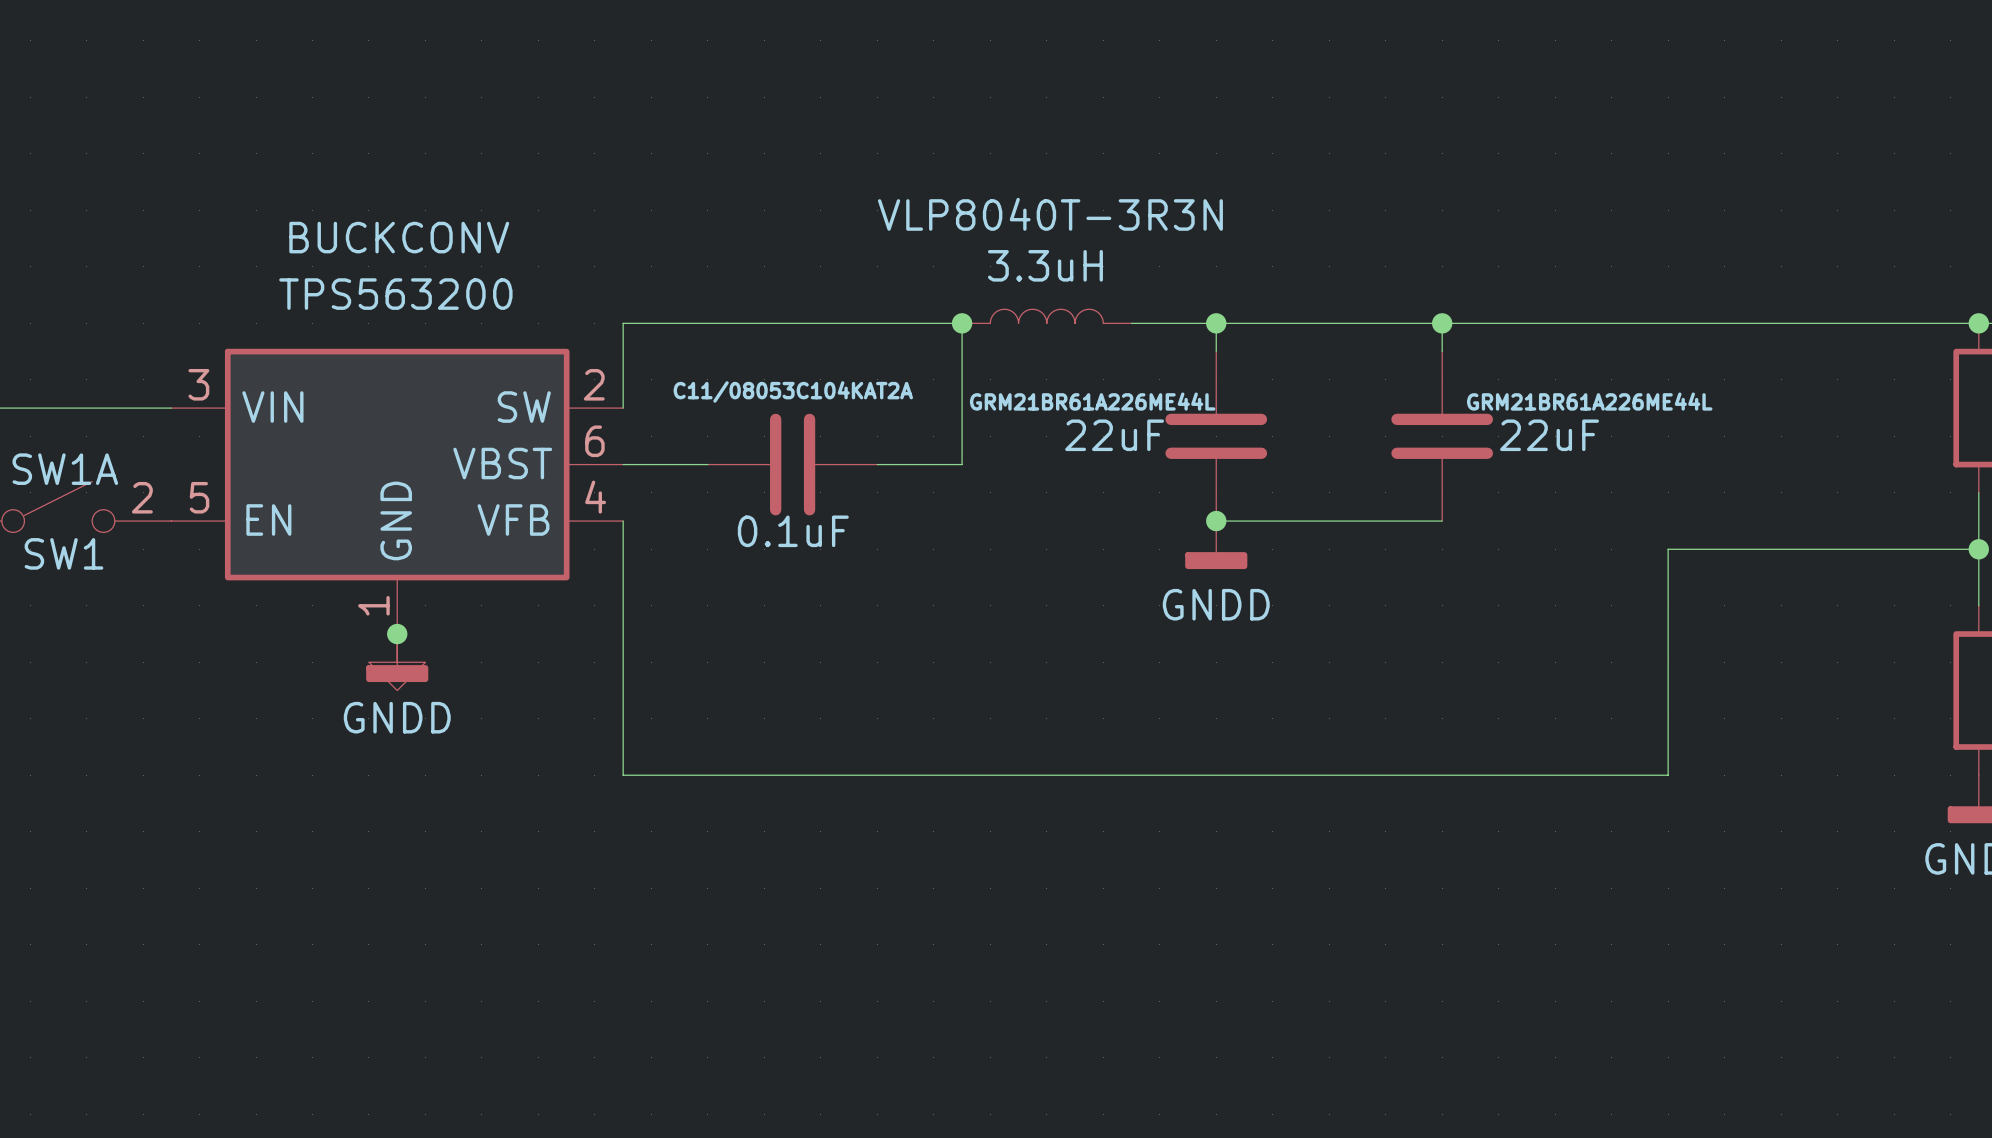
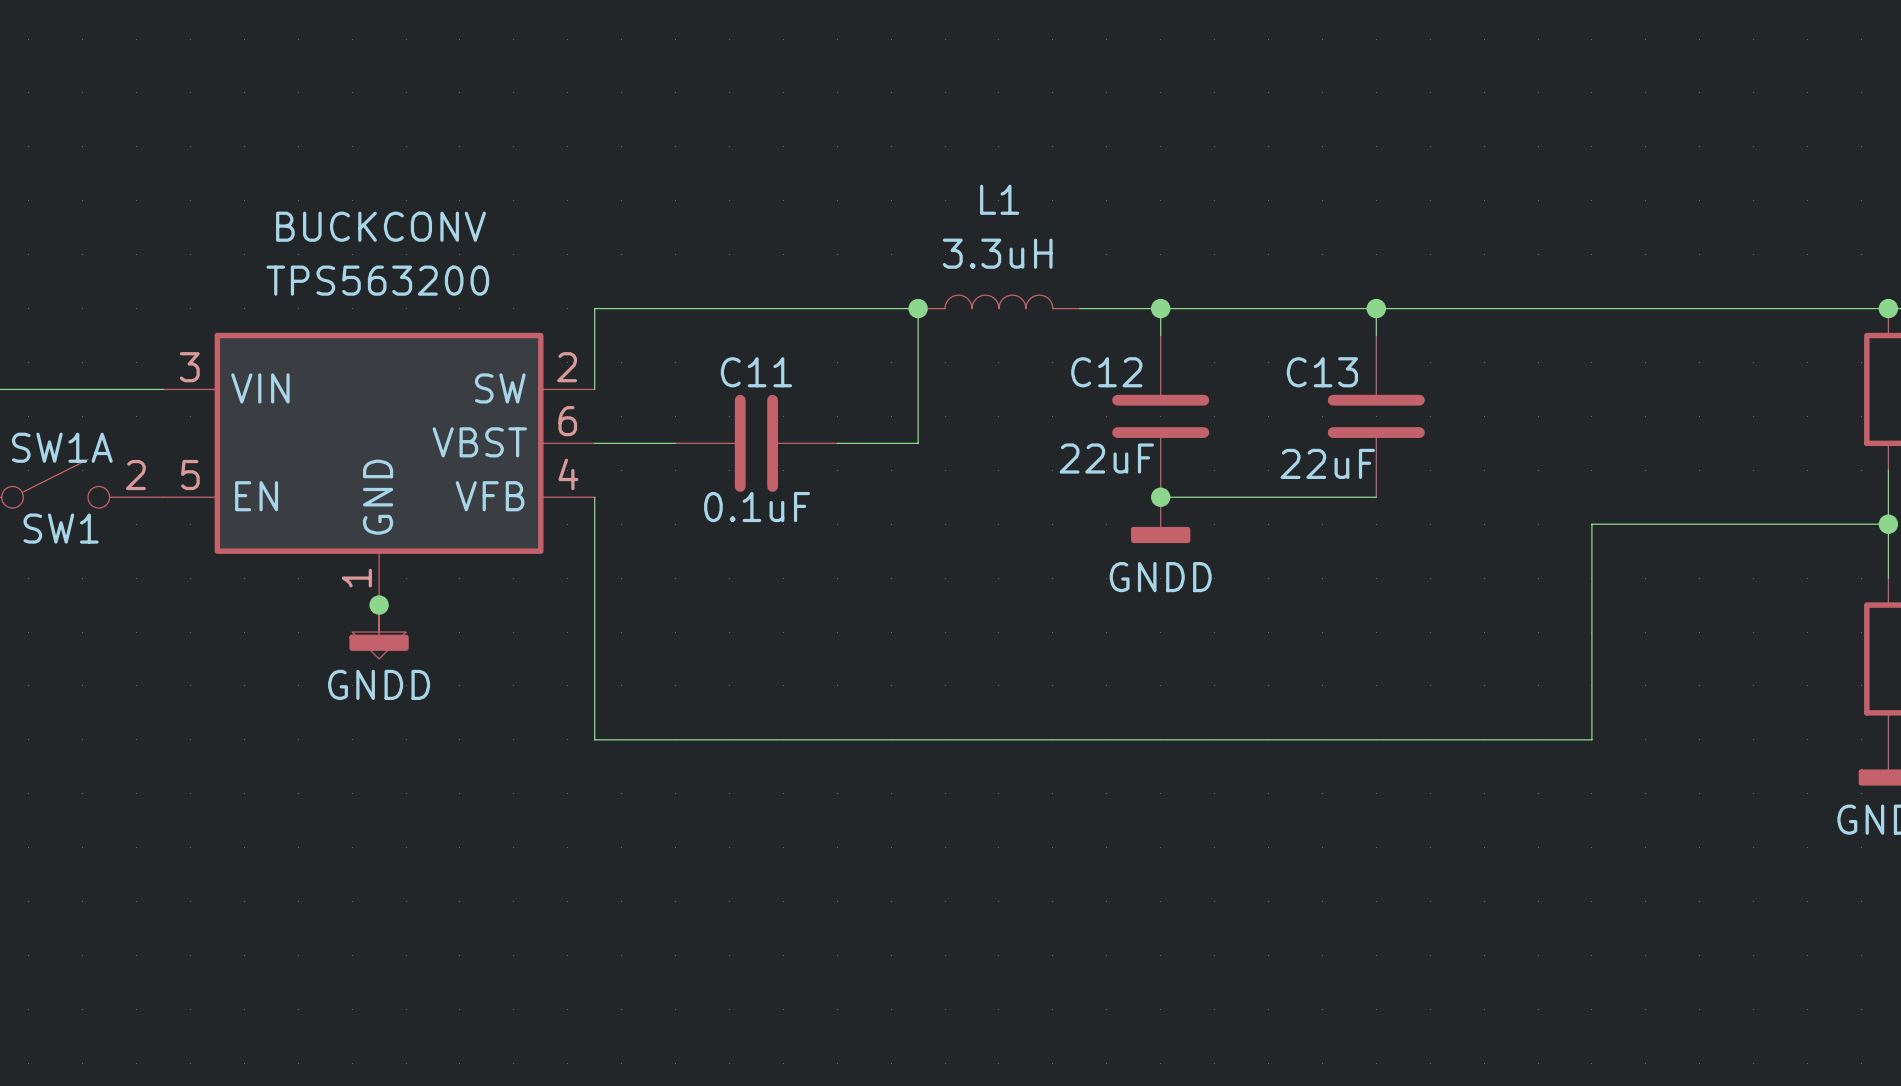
VLP8040T-3R3N name: VLP8040T-3R3N (1050, 214) -> L1 (999, 199)
C11/08053C104KAT2A name: C11/08053C104KAT2A (793, 391) -> C11 (756, 372)
GRM21BR61A226ME44L name: GRM21BR61A226ME44L (1092, 401) -> C12 (1106, 372)
GRM21BR61A226ME44L name: GRM21BR61A226ME44L (1589, 401) -> C13 (1322, 372)
GRM21BR61A226ME44L value position: 22uF (1114, 435) -> 22uF (1106, 458)
GRM21BR61A226ME44L value position: 22uF (1549, 435) -> 22uF (1327, 463)

